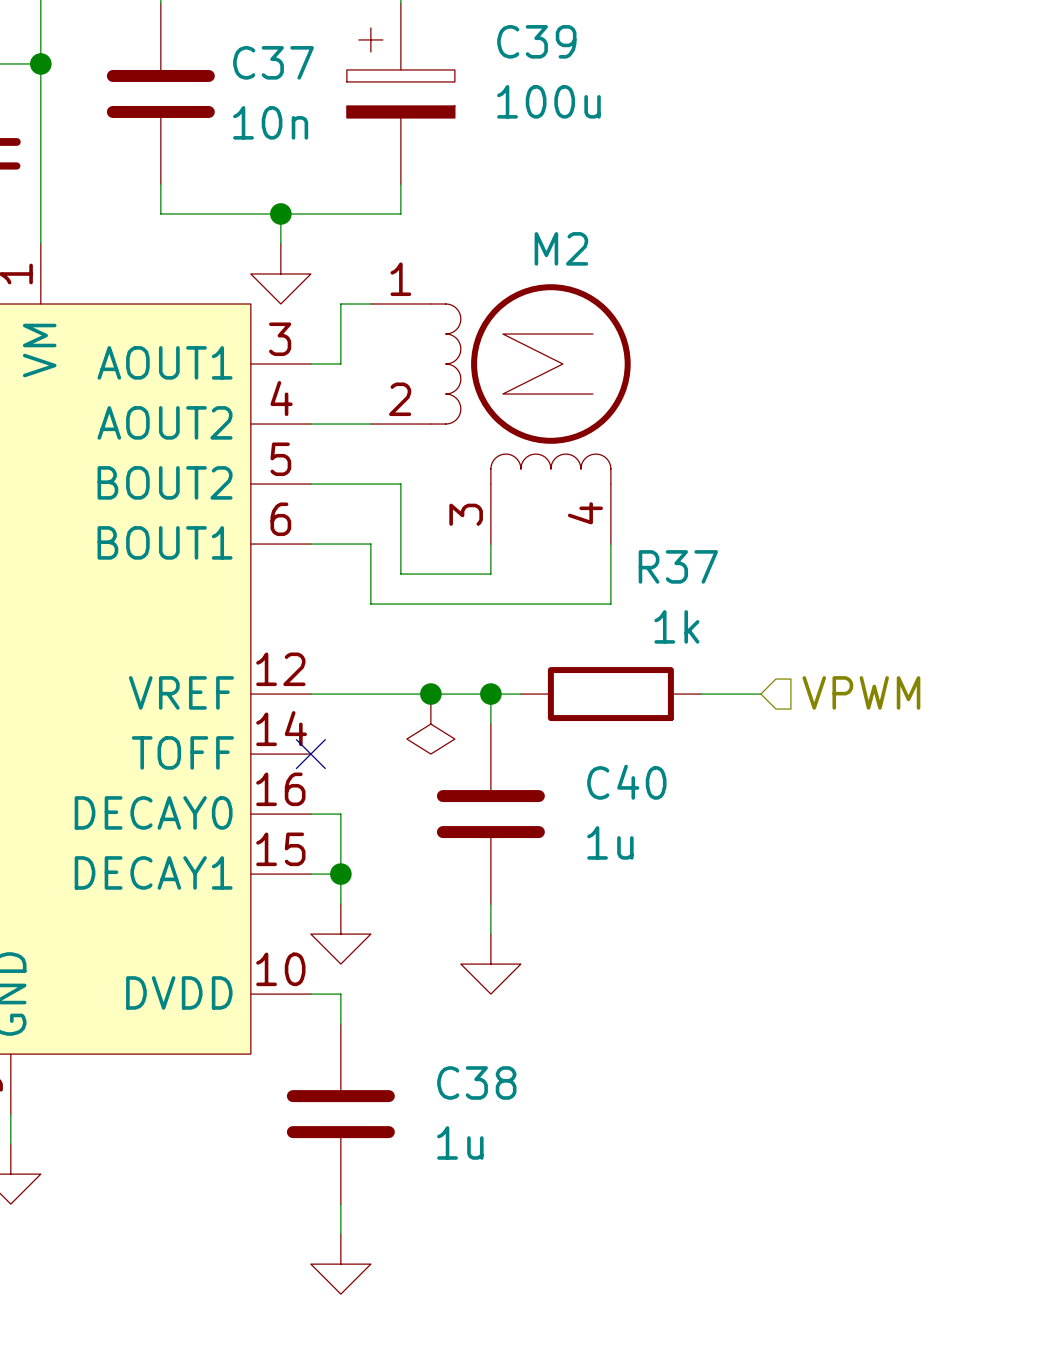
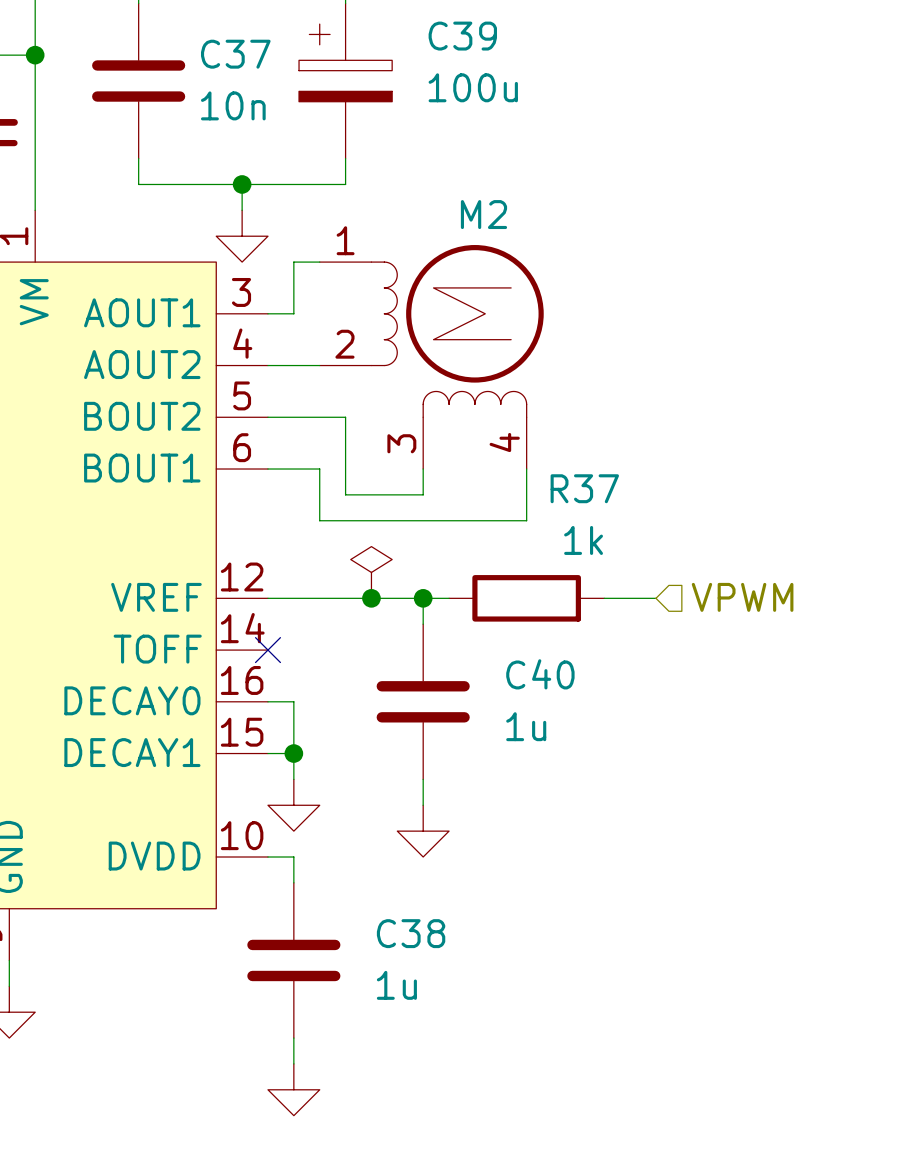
power symbol rotation: 0° (430, 724) -> 180° (371, 572)
power symbol position: (430, 724) -> (371, 572)

